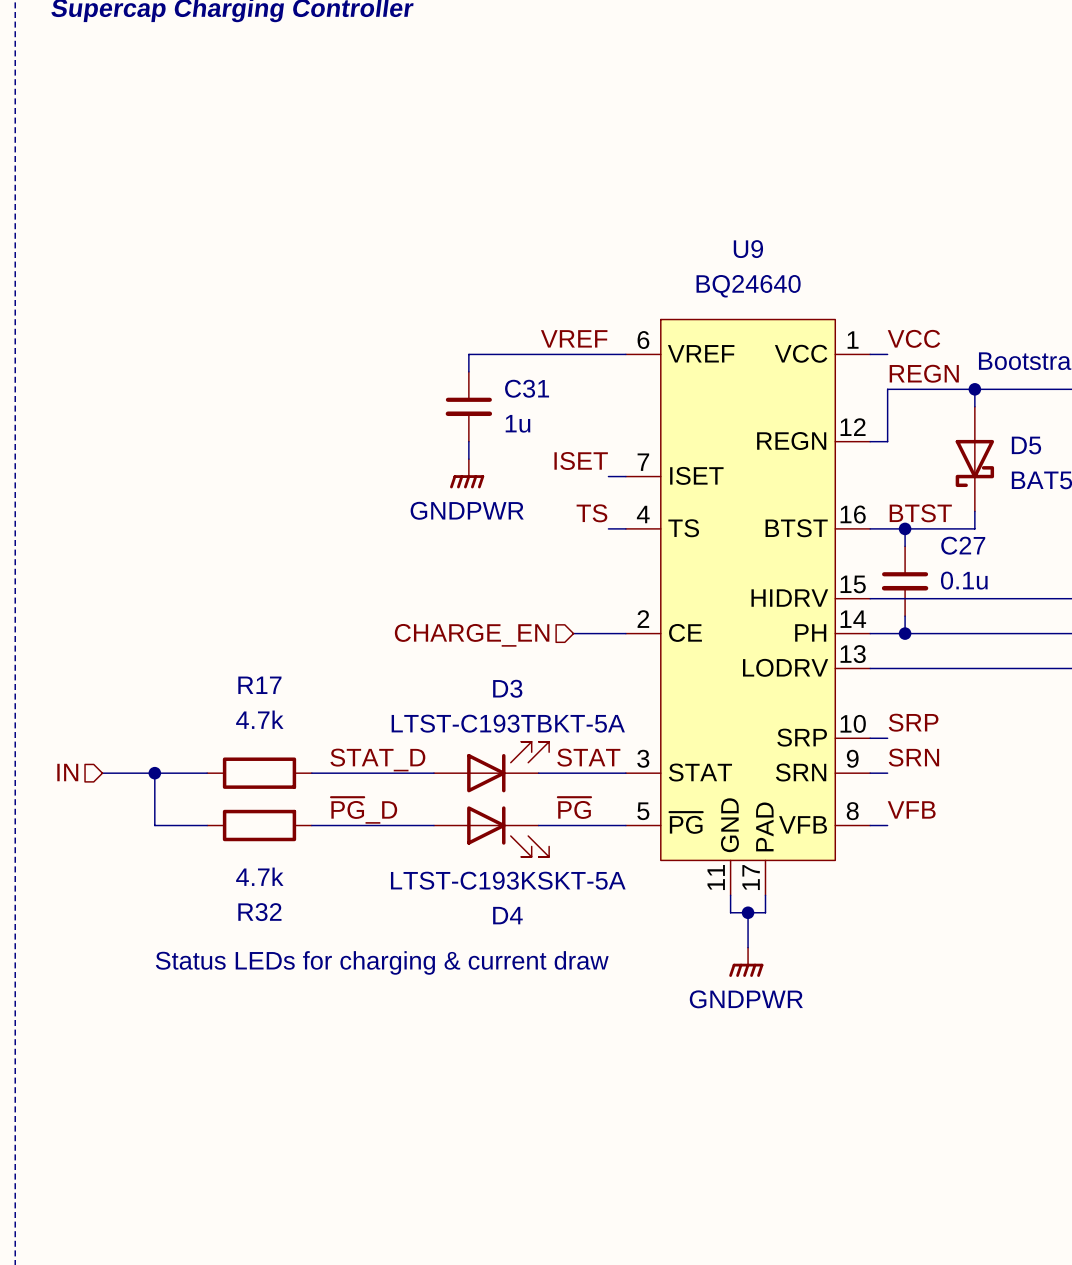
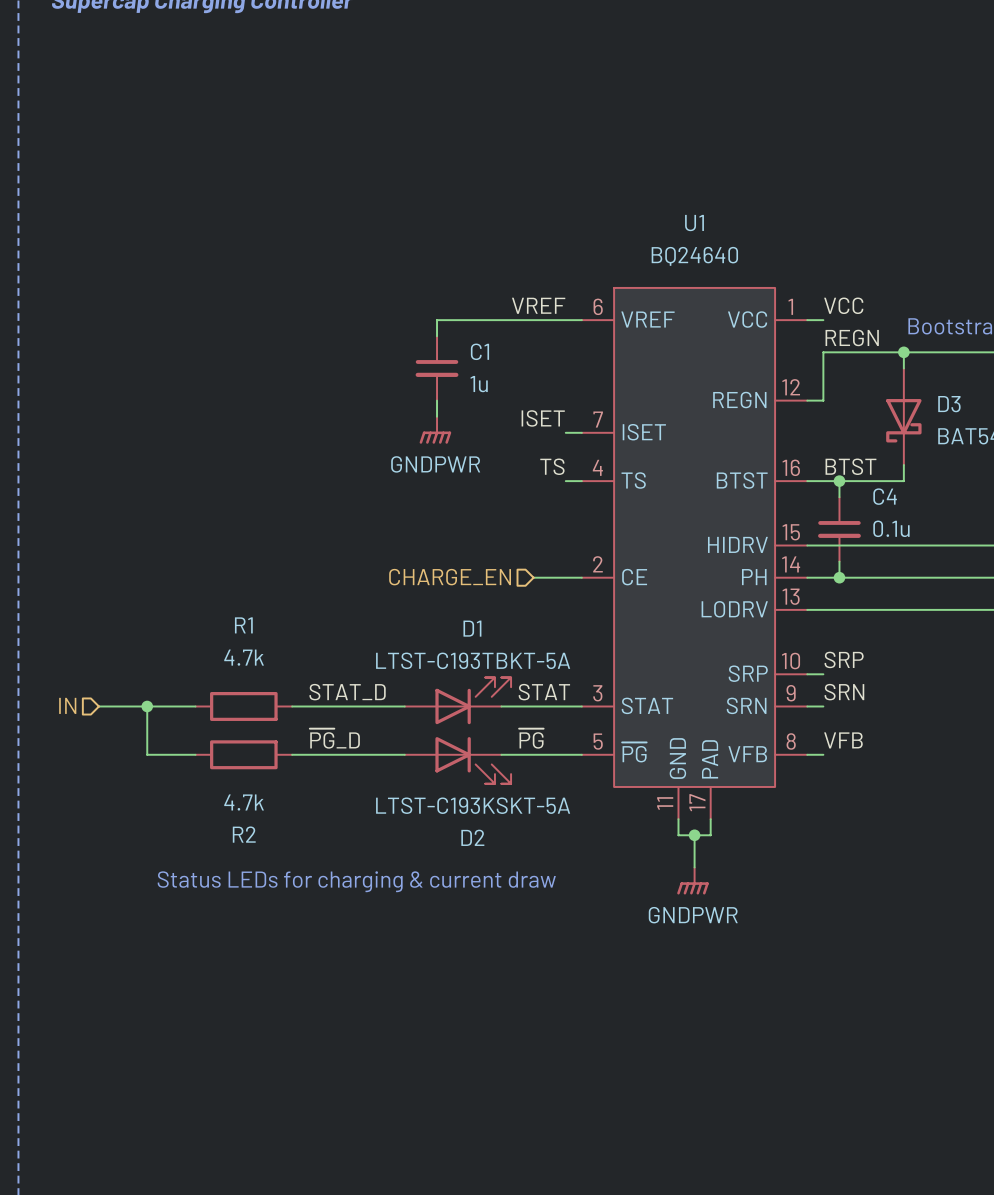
U9 name: U9 (748, 249) -> U1 (694, 223)
C31 name: C31 (527, 388) -> C1 (479, 351)
D5 name: D5 (1026, 445) -> D3 (949, 404)
C27 name: C27 (963, 545) -> C4 (885, 496)
R17 name: R17 (259, 685) -> R1 (243, 625)
D3 name: D3 (507, 688) -> D1 (472, 628)
R32 name: R32 (259, 912) -> R2 (244, 834)
D4 name: D4 (507, 915) -> D2 (472, 837)

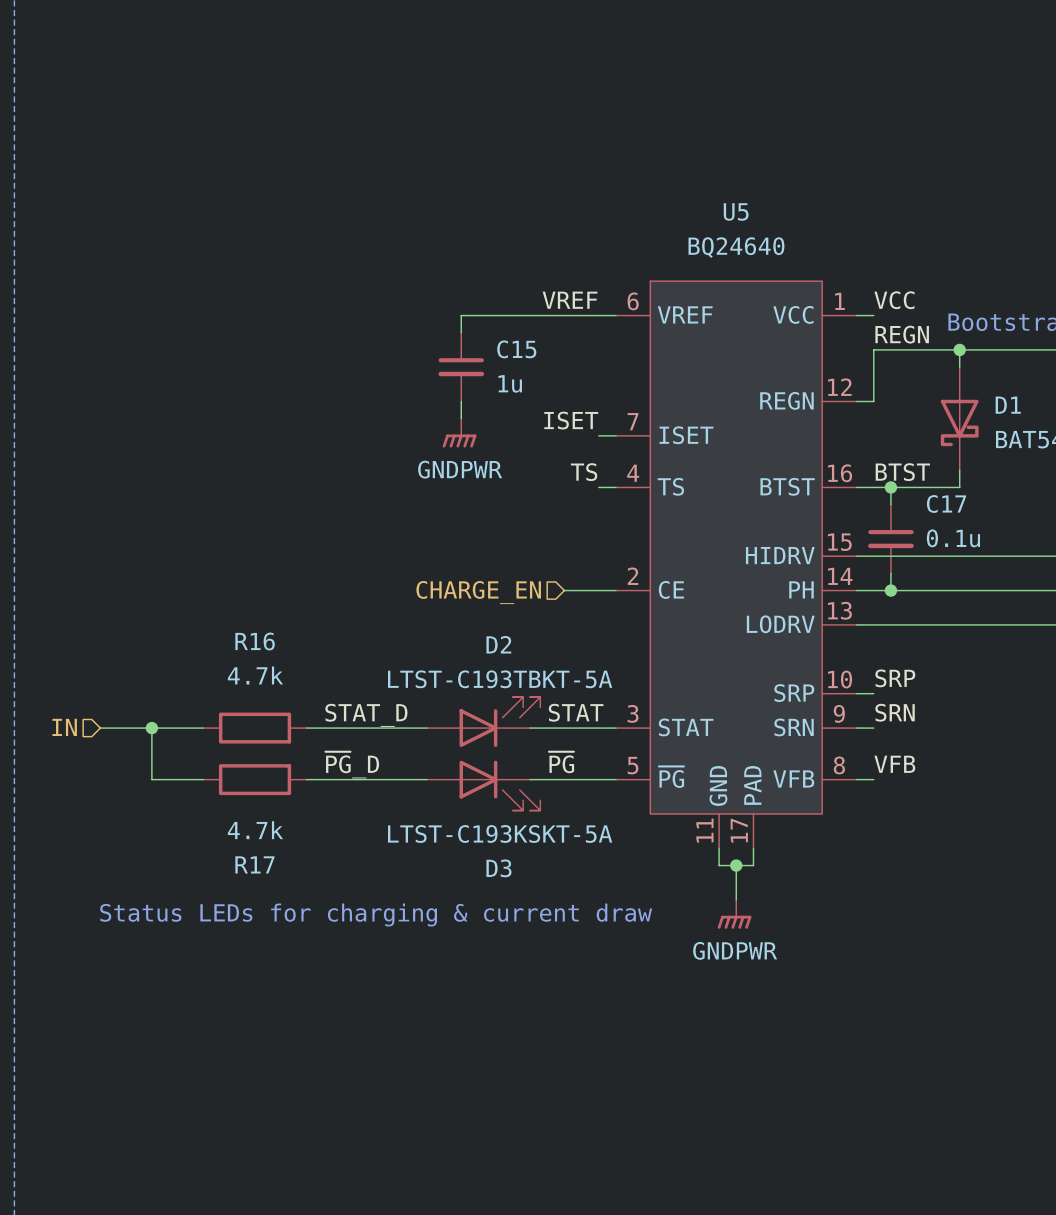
U1 name: U1 (694, 223) -> U5 (736, 211)
C1 name: C1 (479, 351) -> C15 (516, 349)
D3 name: D3 (949, 404) -> D1 (1008, 405)
C4 name: C4 (885, 496) -> C17 (946, 503)
R1 name: R1 (243, 625) -> R16 (255, 641)
D1 name: D1 (472, 628) -> D2 (498, 644)
R2 name: R2 (244, 834) -> R17 (254, 864)
D2 name: D2 (472, 837) -> D3 (498, 868)

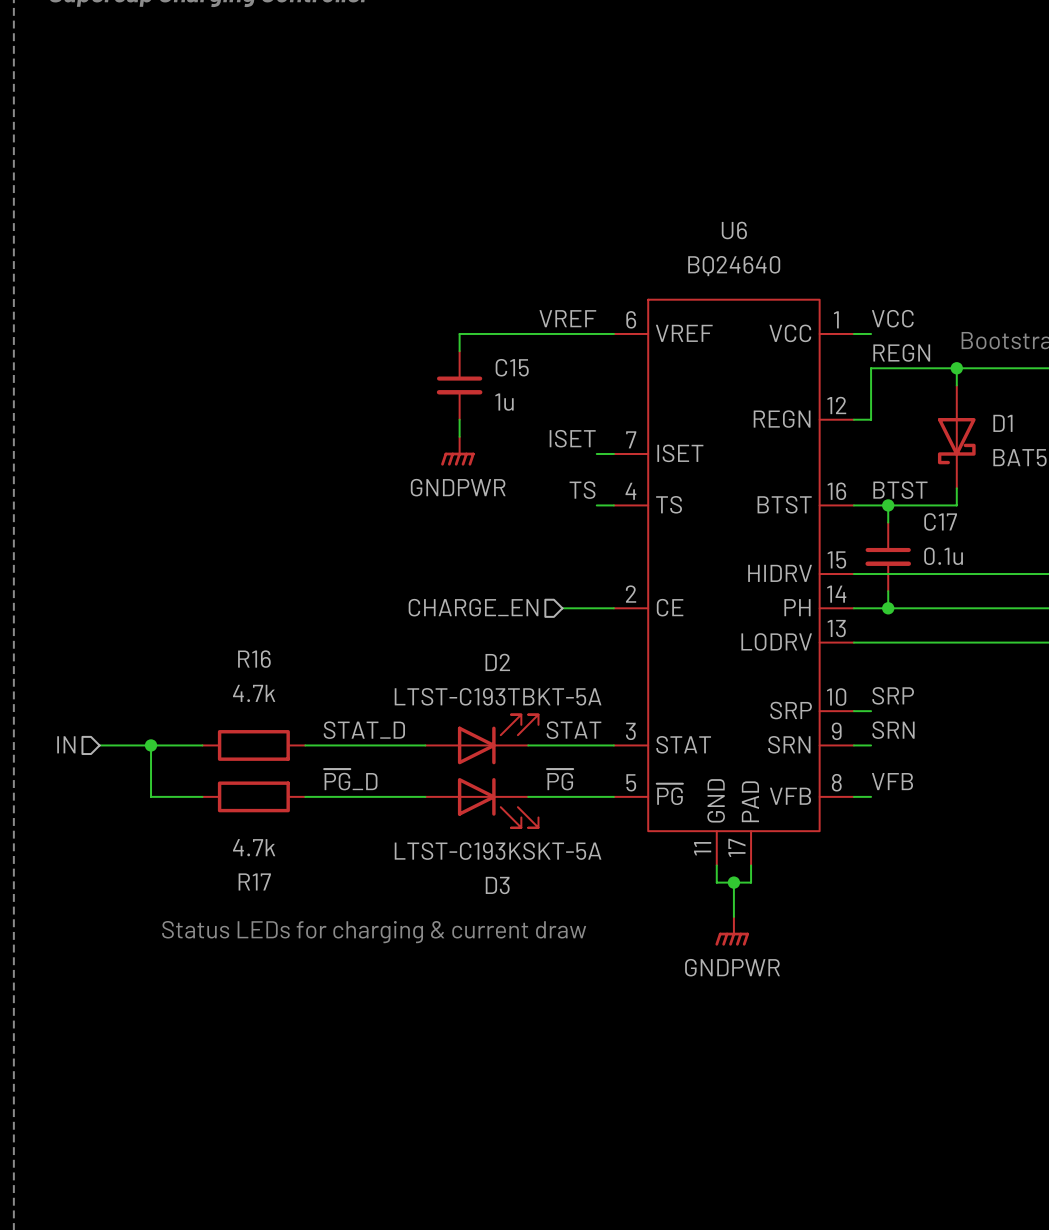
U5 name: U5 (736, 211) -> U6 (734, 230)

